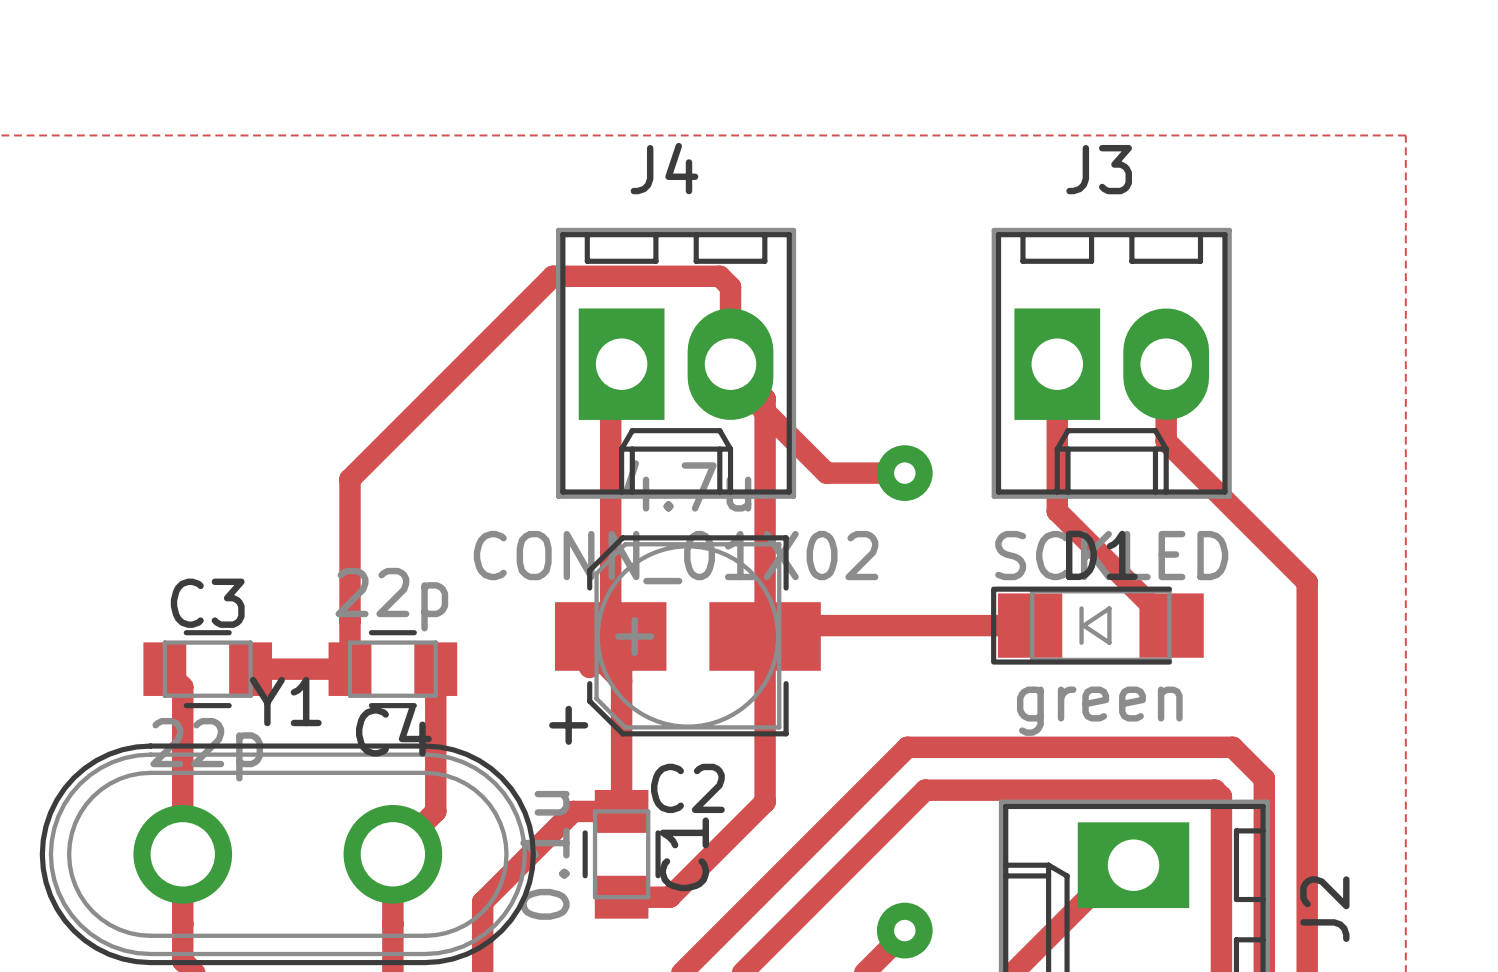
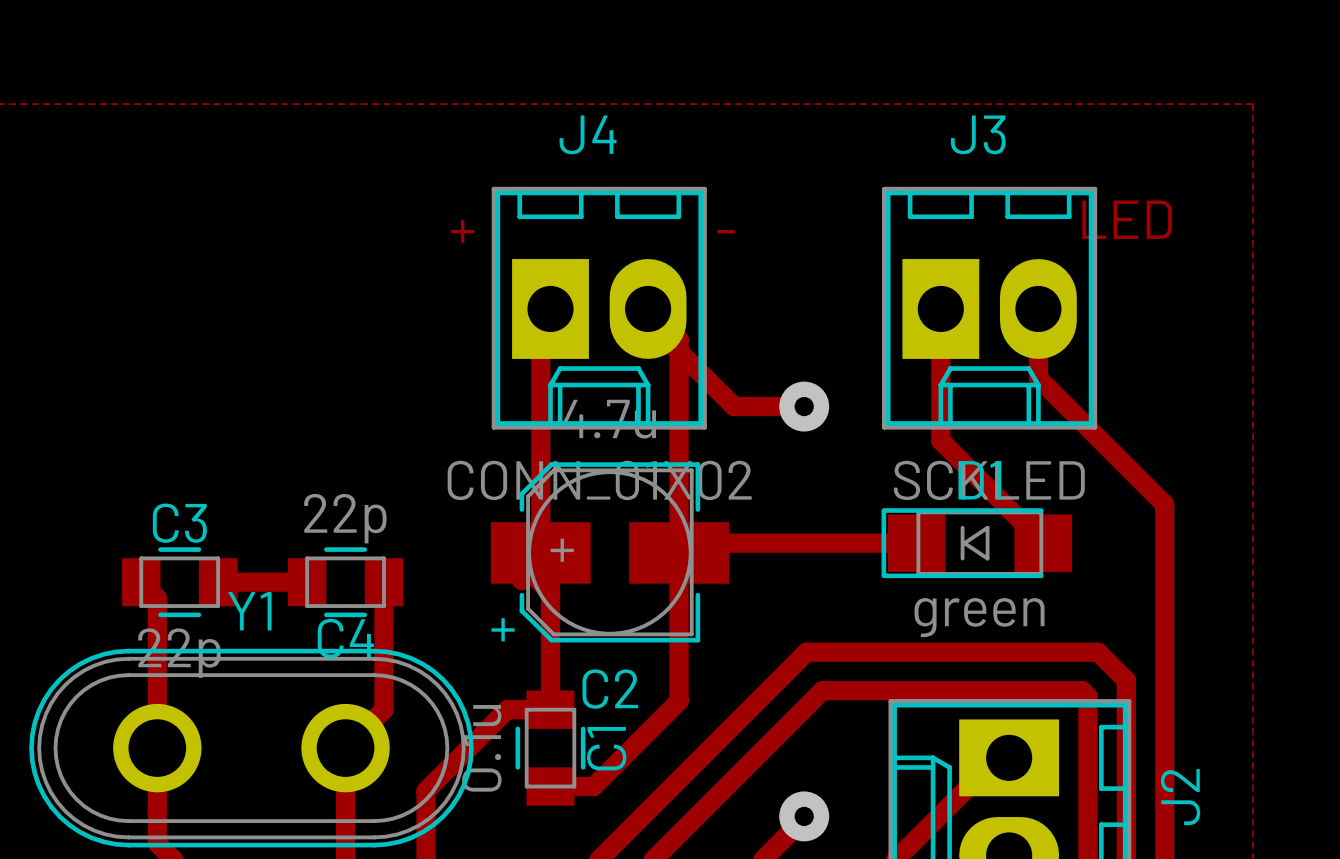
text: none -> LED (1127, 219)
text: none -> + (462, 231)
text: none -> - (726, 231)
track: (730, 364) (730, 287) (719, 276) (552, 276) (350, 479) (350, 669) -> none

